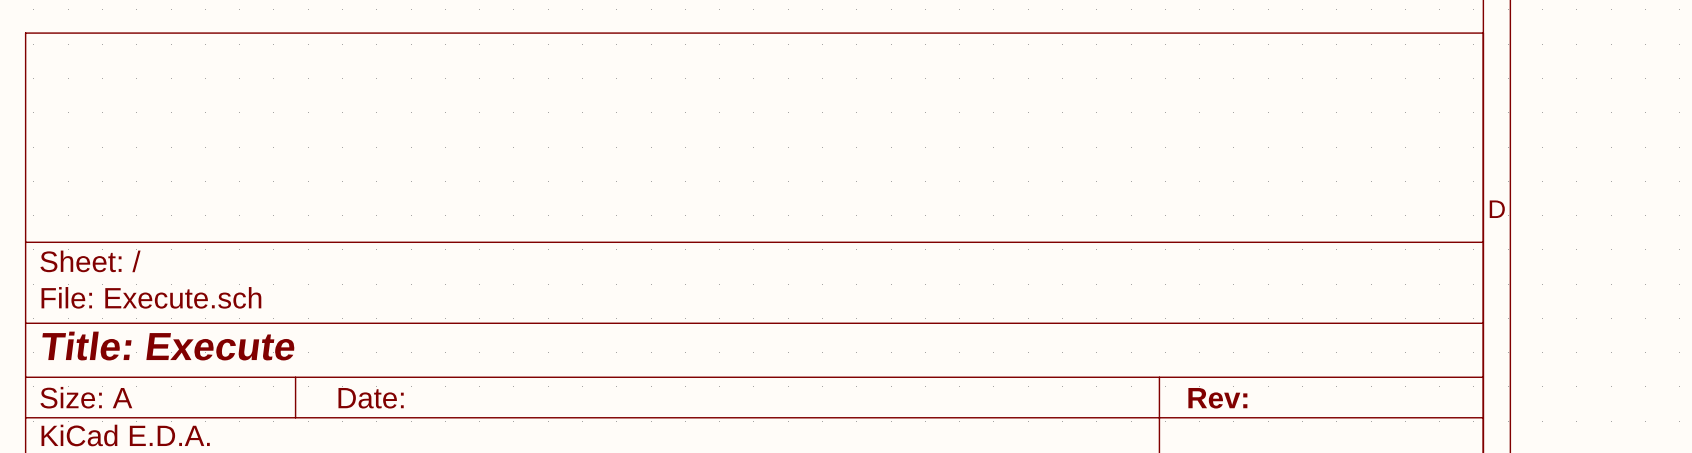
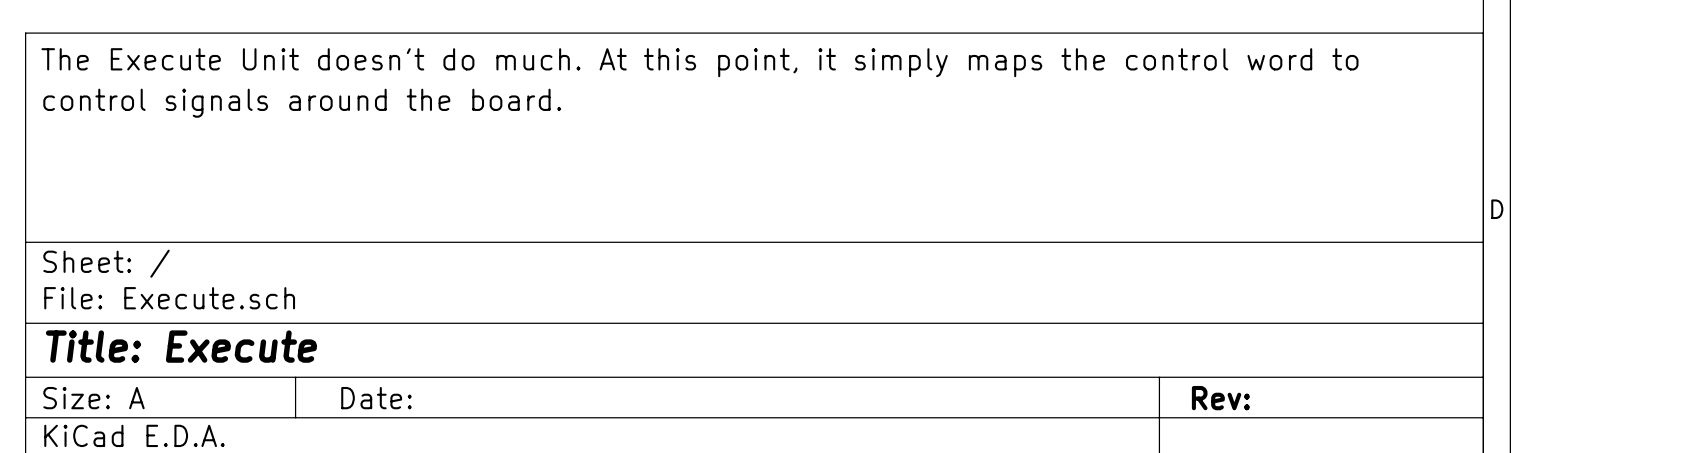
title block: none -> The Execute Unit doesn't do much. At this point, it simply maps the control word to (699, 62)
title block: none -> control signals around the board. (302, 103)

